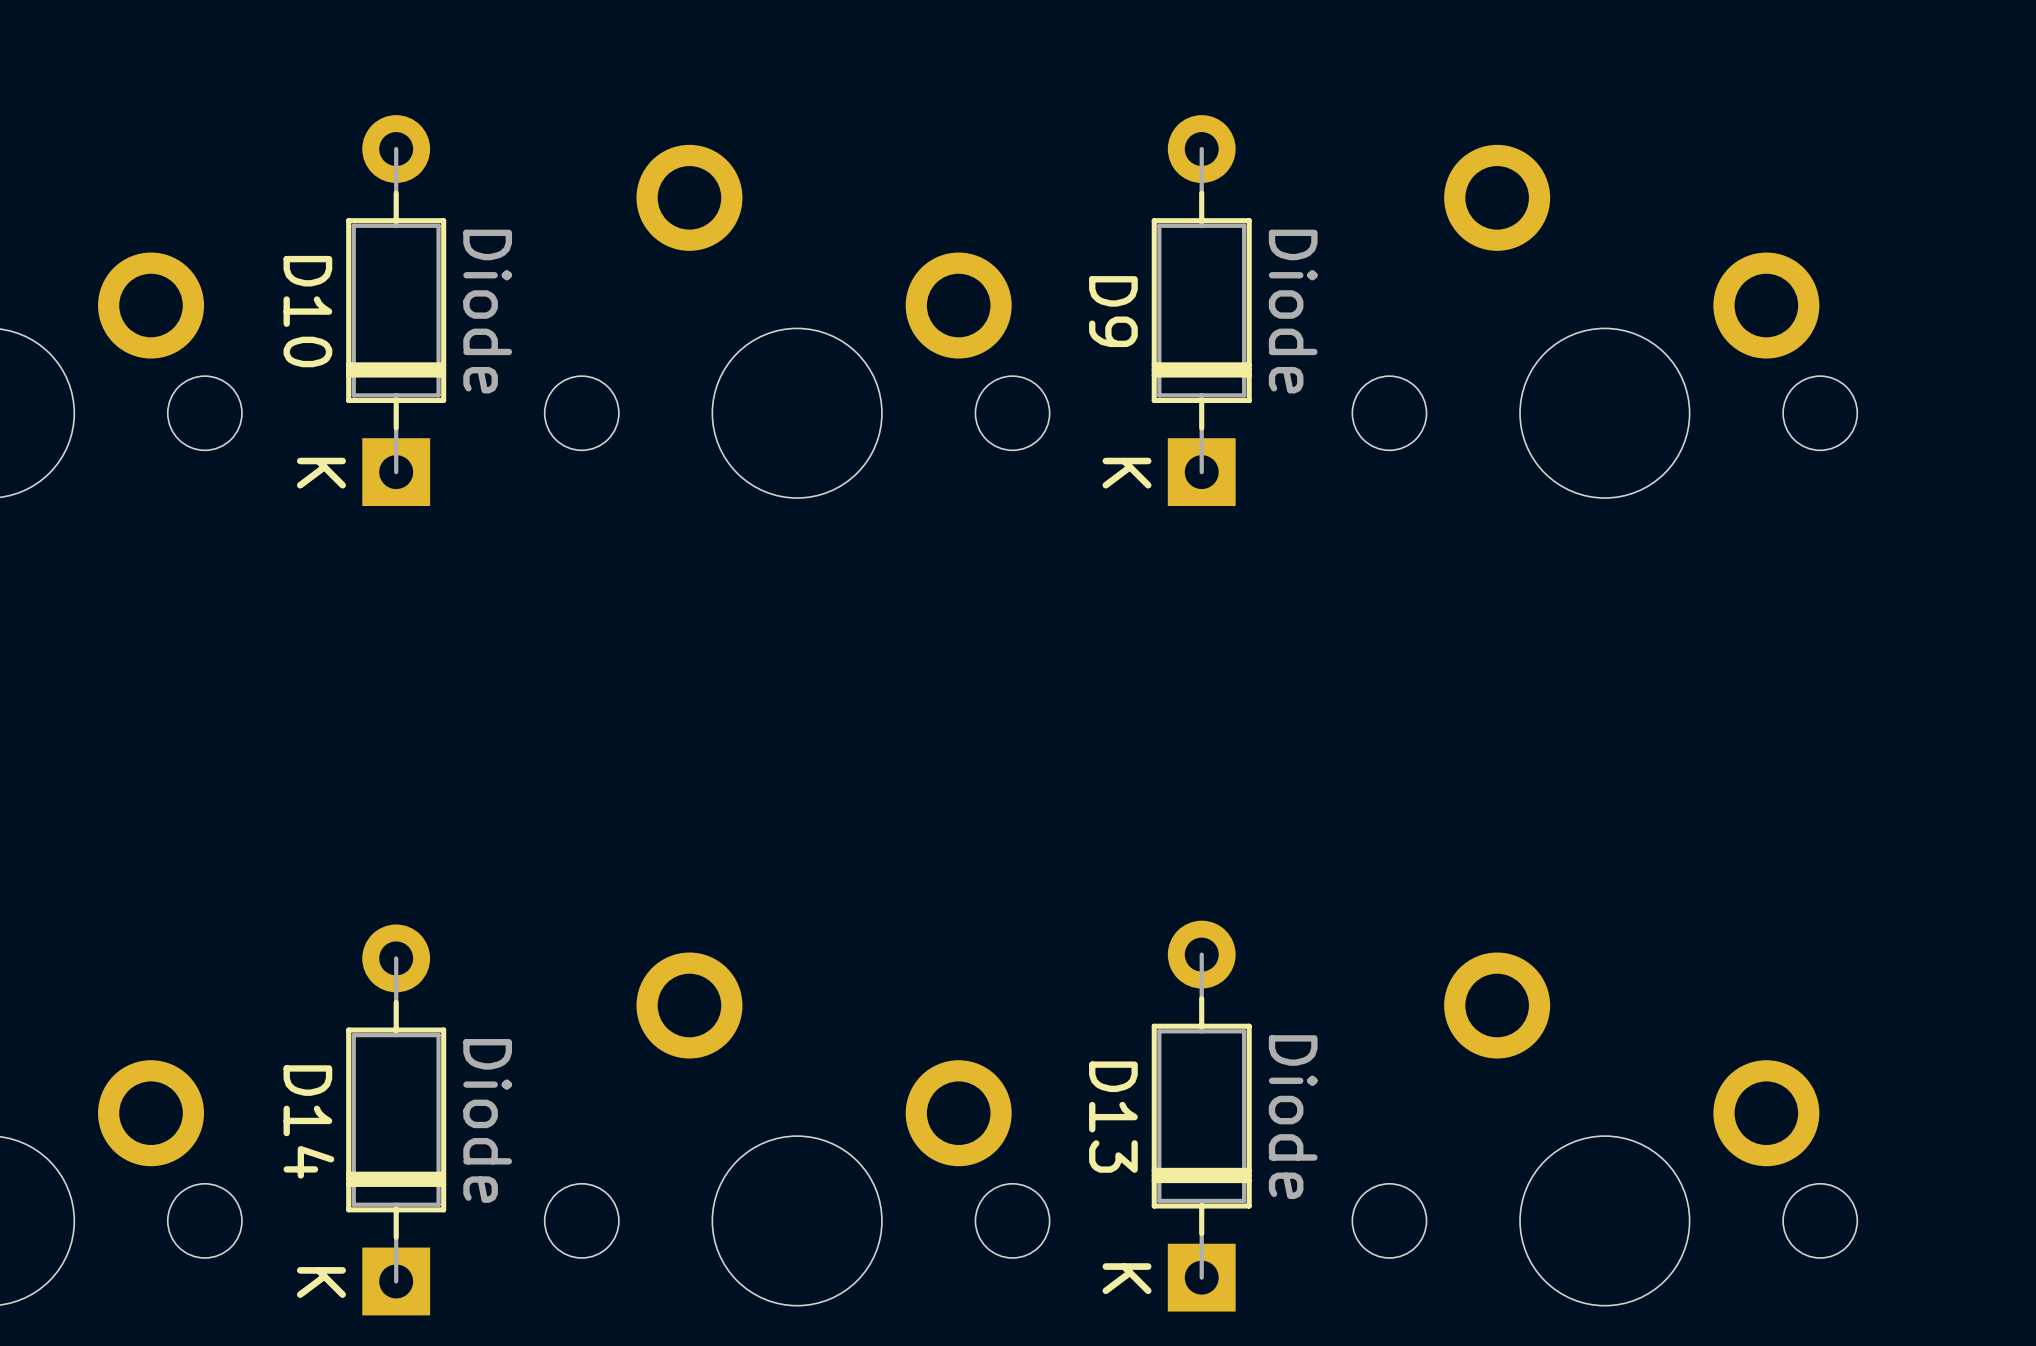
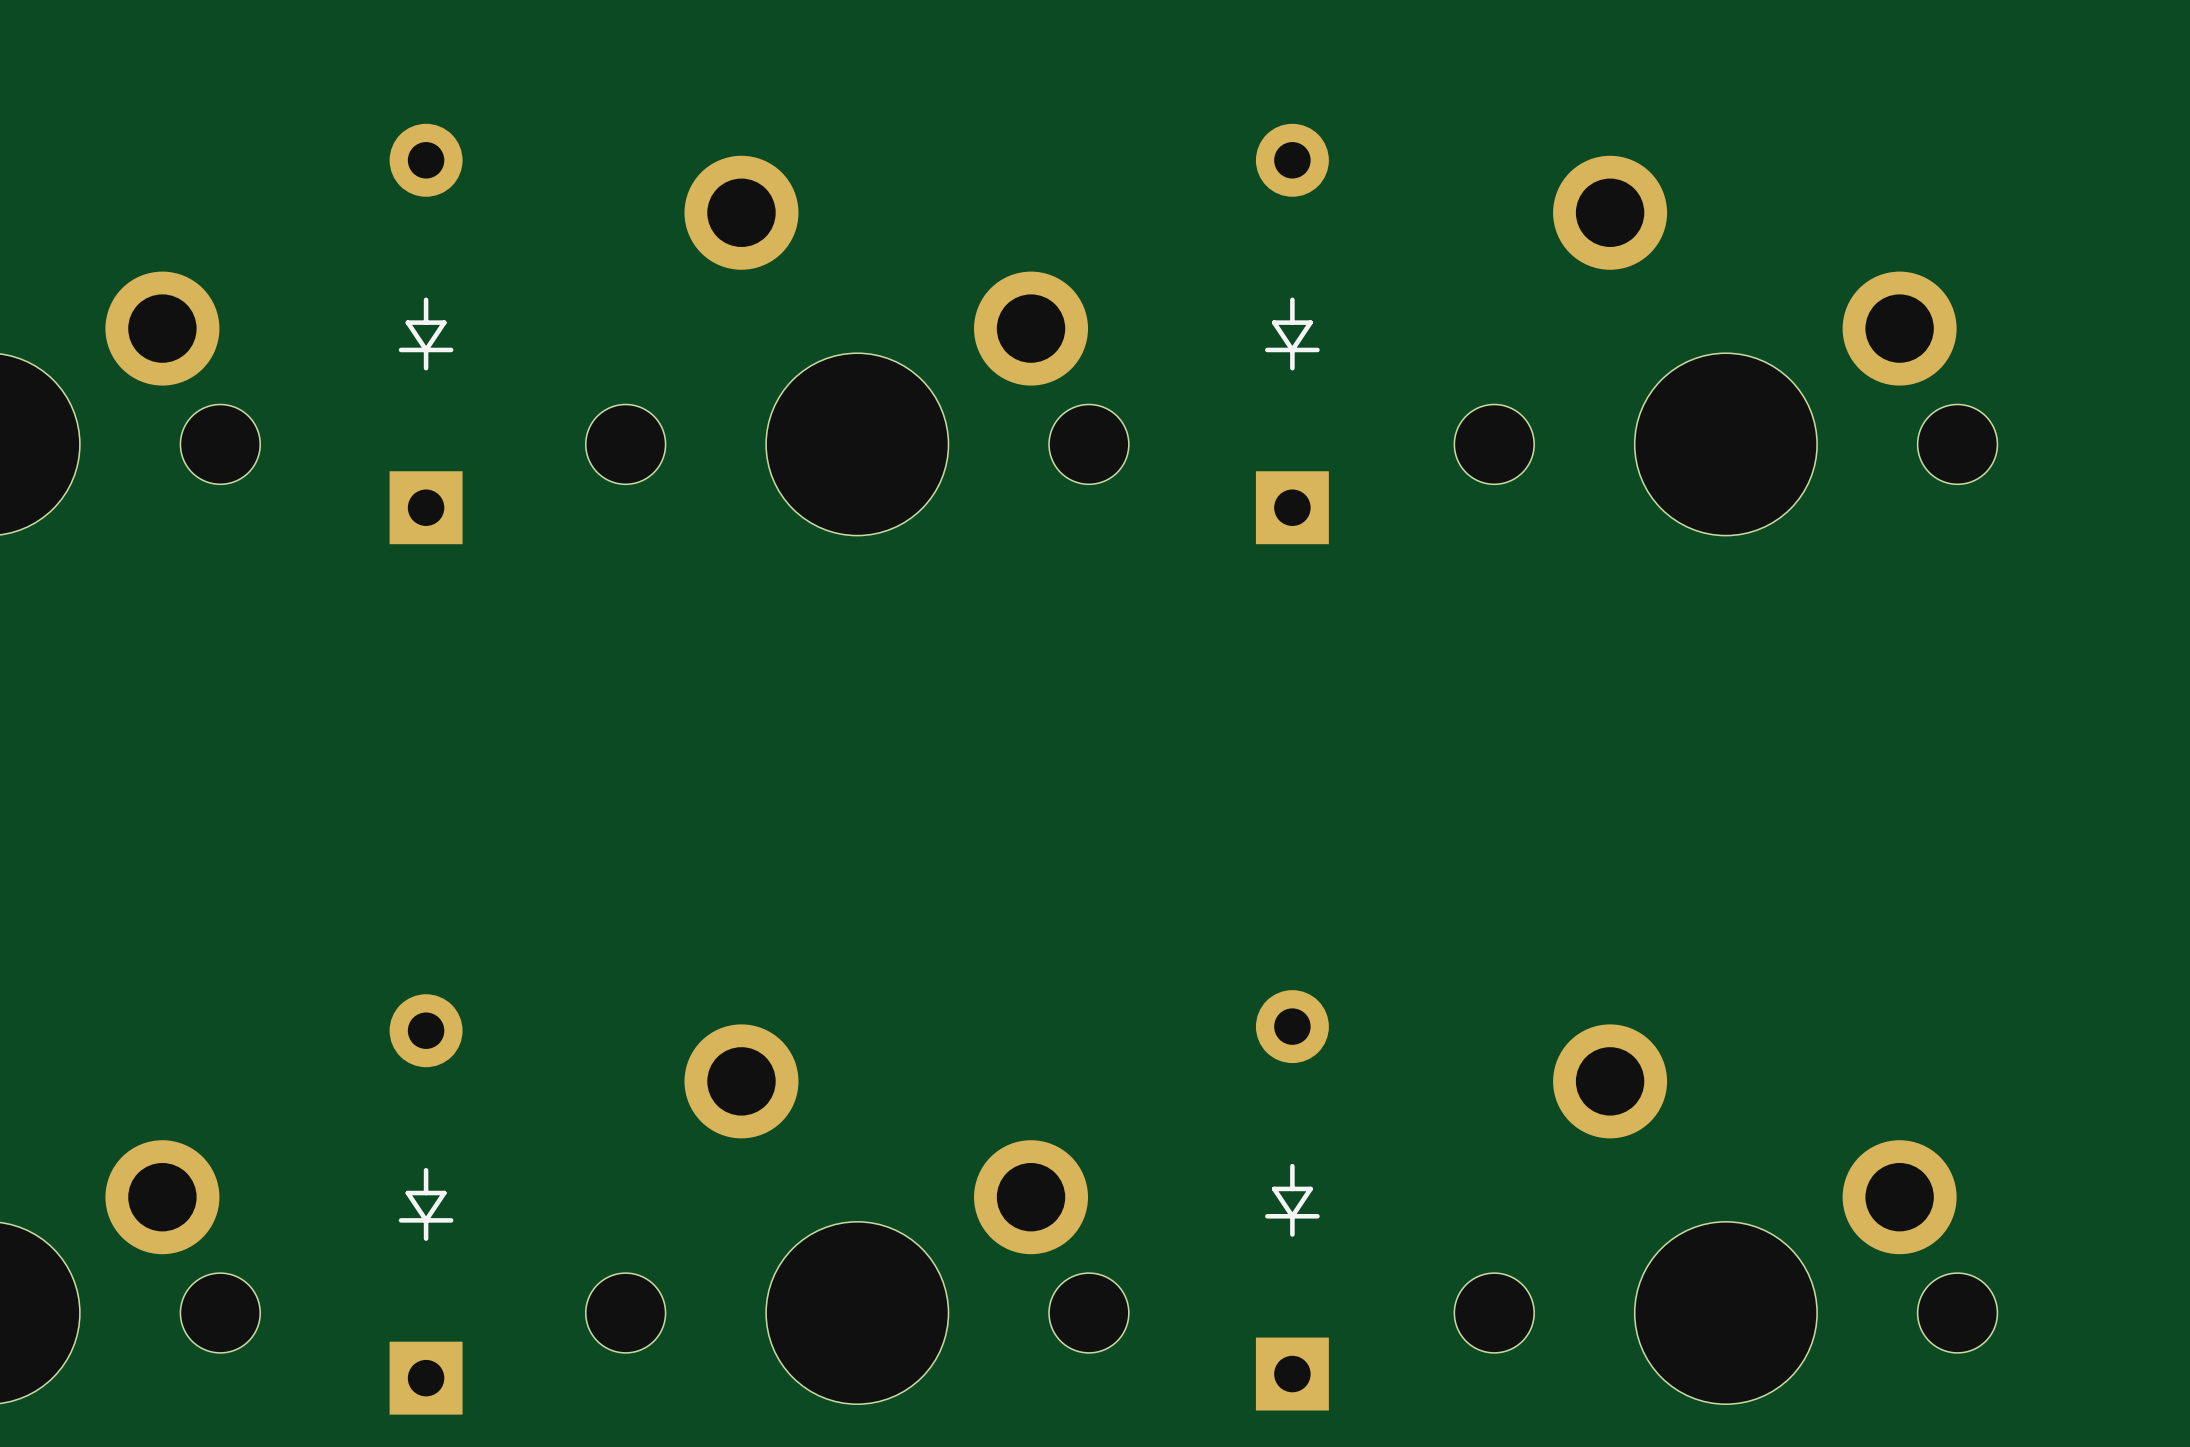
D10: Diode (396, 310) -> none
part: none -> (426, 334)
D9: Diode (1201, 310) -> none
part: none -> (1292, 334)
D13: Diode (1201, 1116) -> none
part: none -> (1292, 1200)
D14: Diode (396, 1119) -> none
part: none -> (426, 1204)

